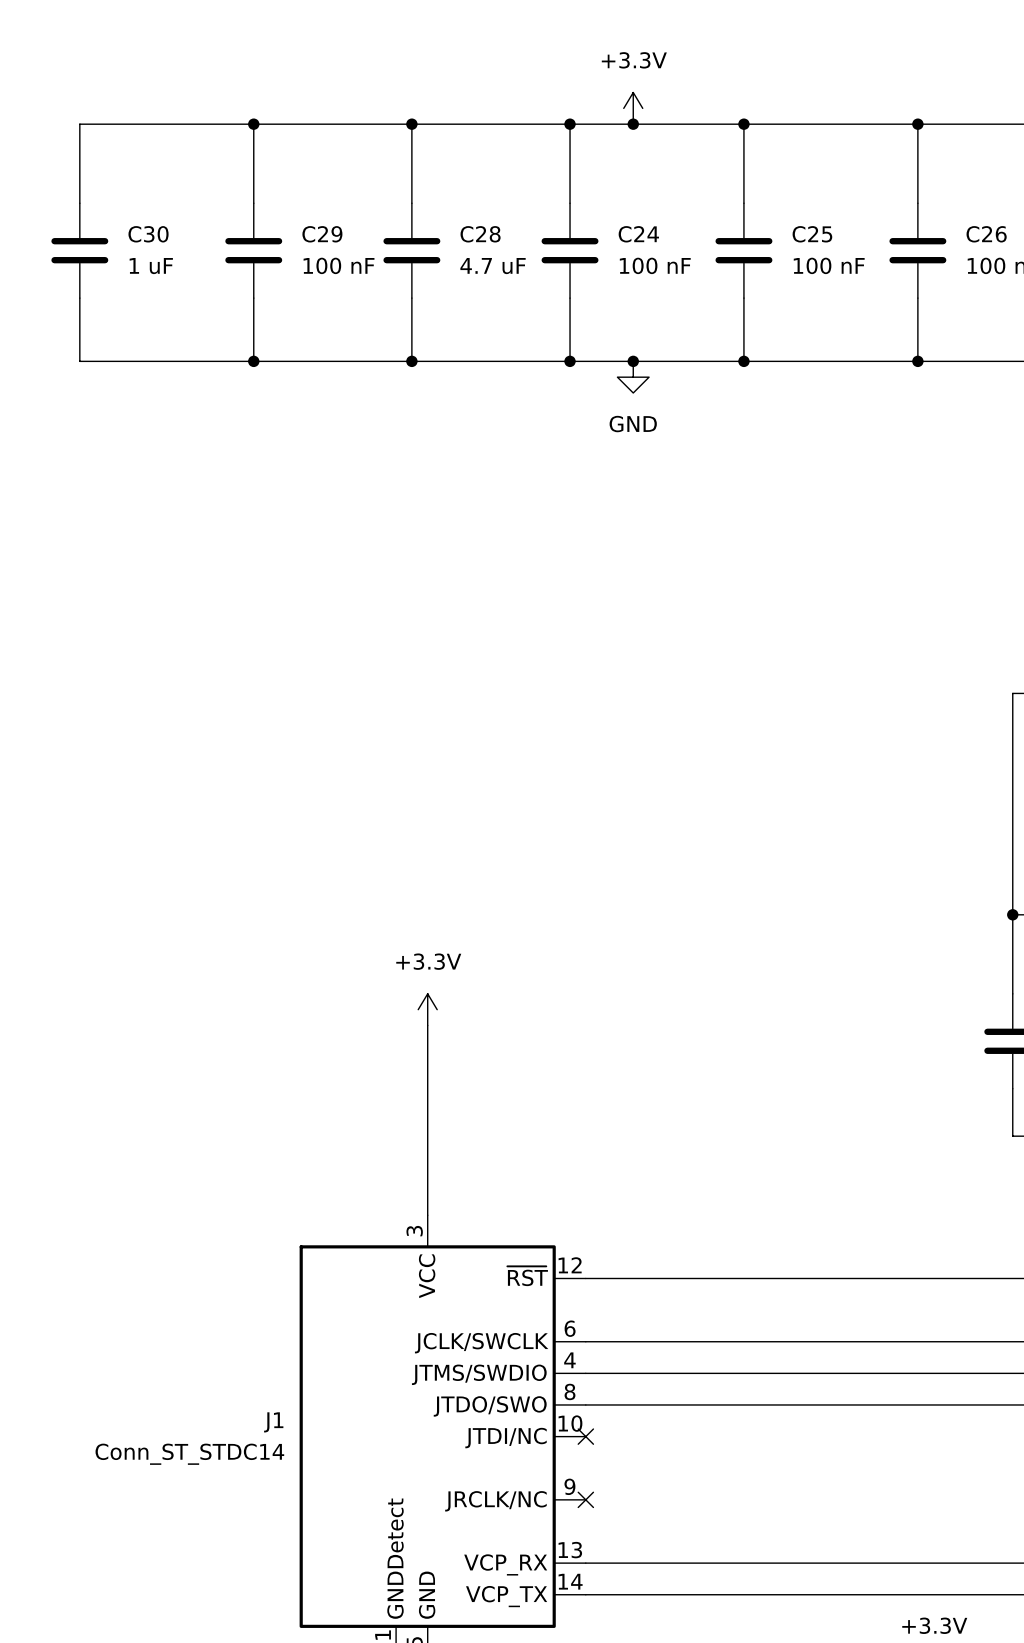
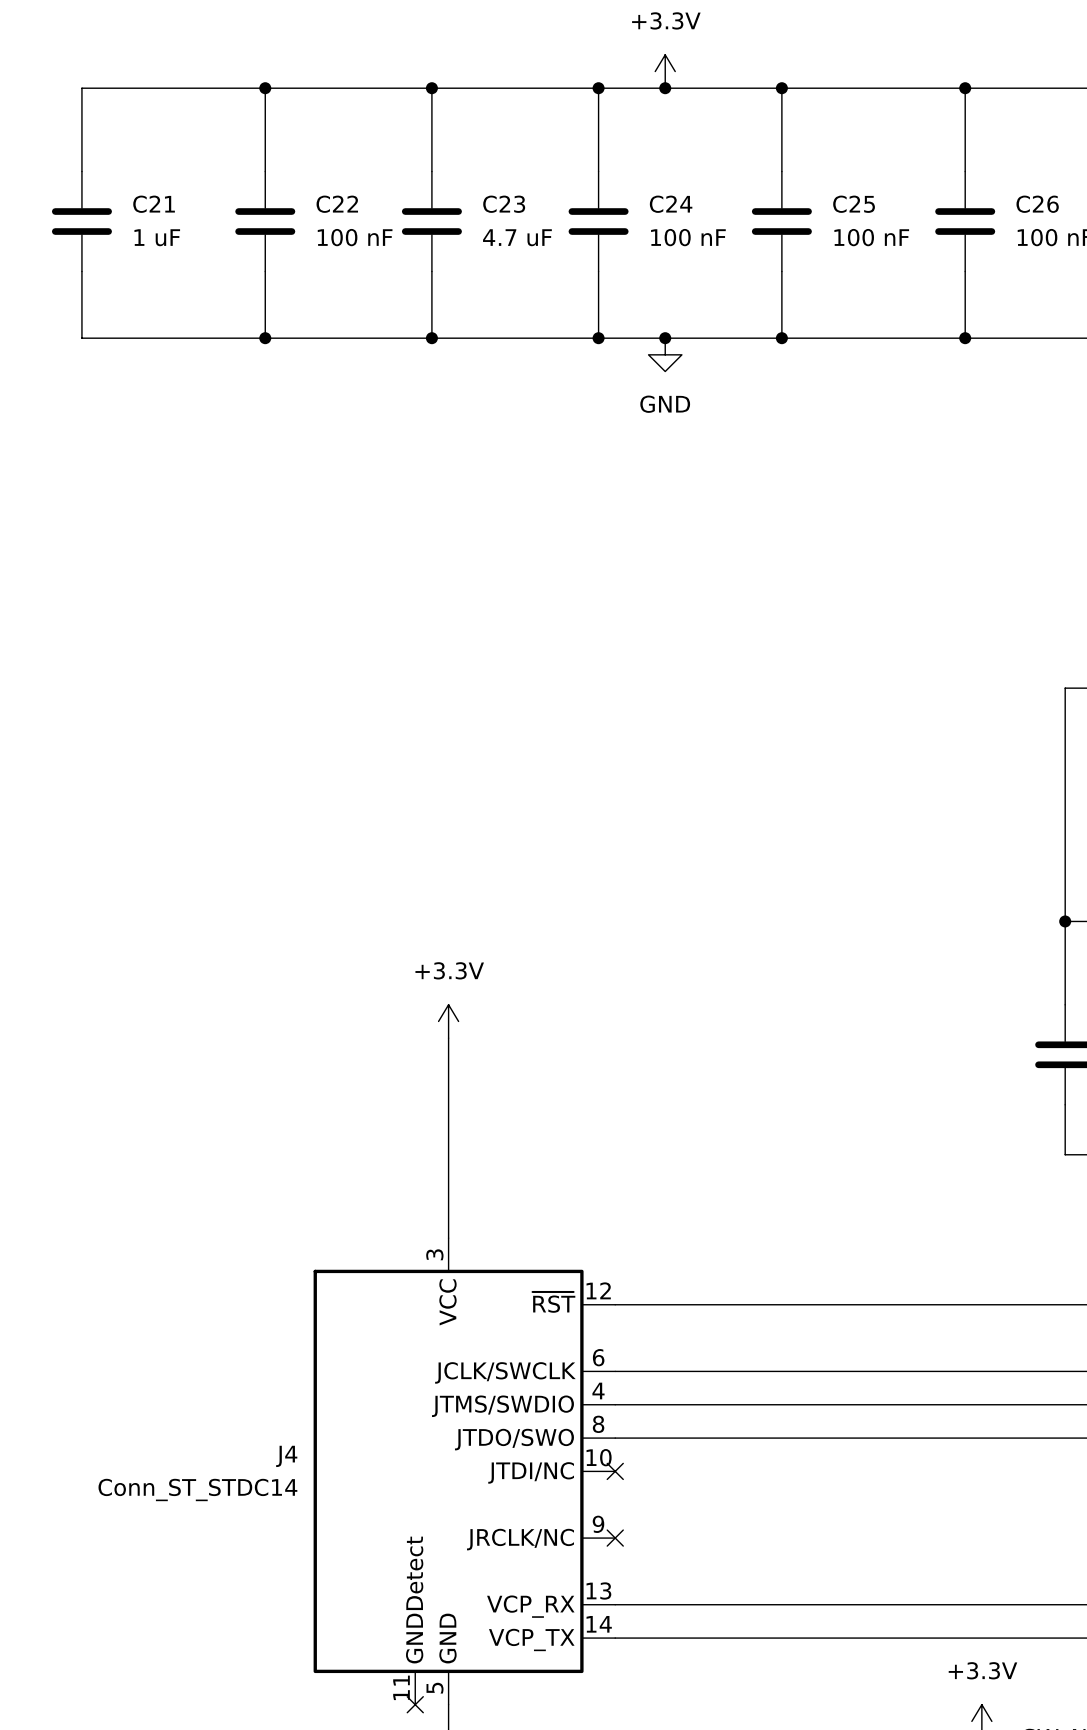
C30 name: C30 (148, 234) -> C21 (154, 204)
C29 name: C29 (322, 234) -> C22 (337, 204)
C28 name: C28 (480, 234) -> C23 (504, 204)
J1 name: J1 (273, 1422) -> J4 (286, 1456)

